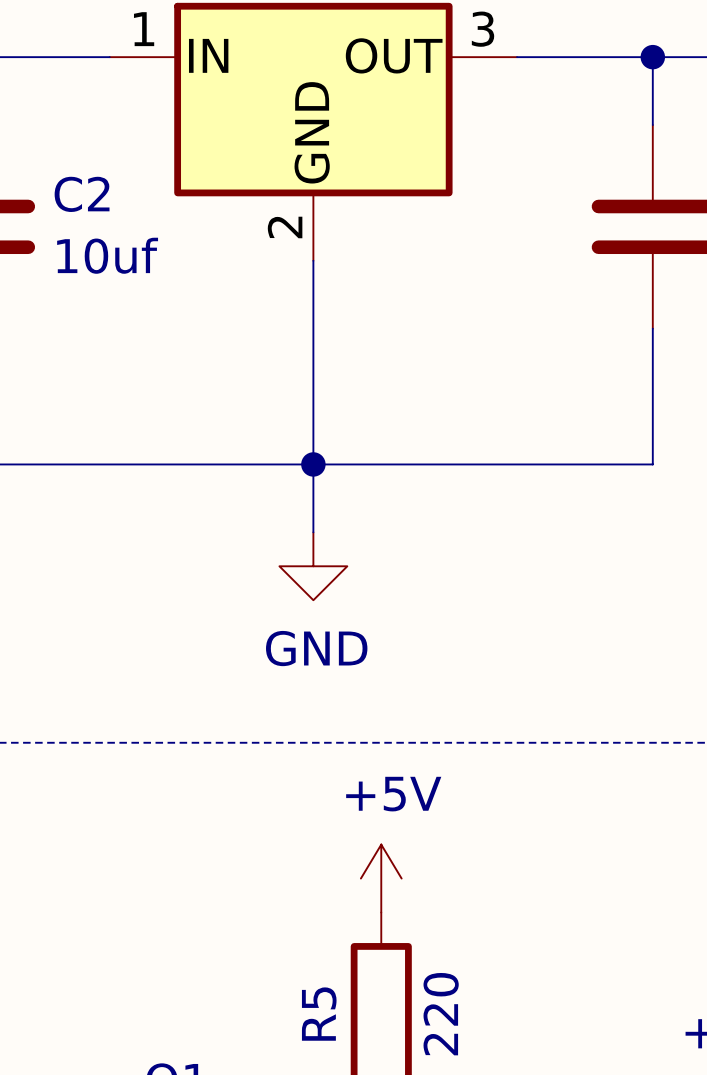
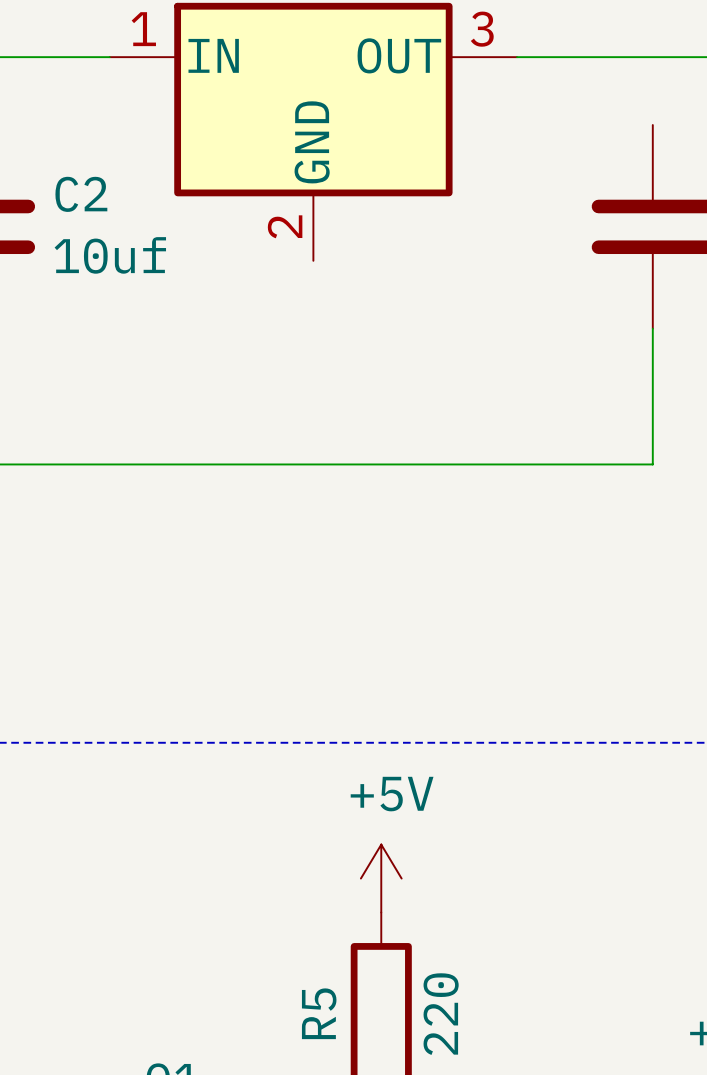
wire: (652, 57) (652, 125) -> none
junction: (652, 57) -> none
wire: (313, 260) (313, 532) -> none
junction: (313, 464) -> none
power symbol: GND (313, 566) -> none

